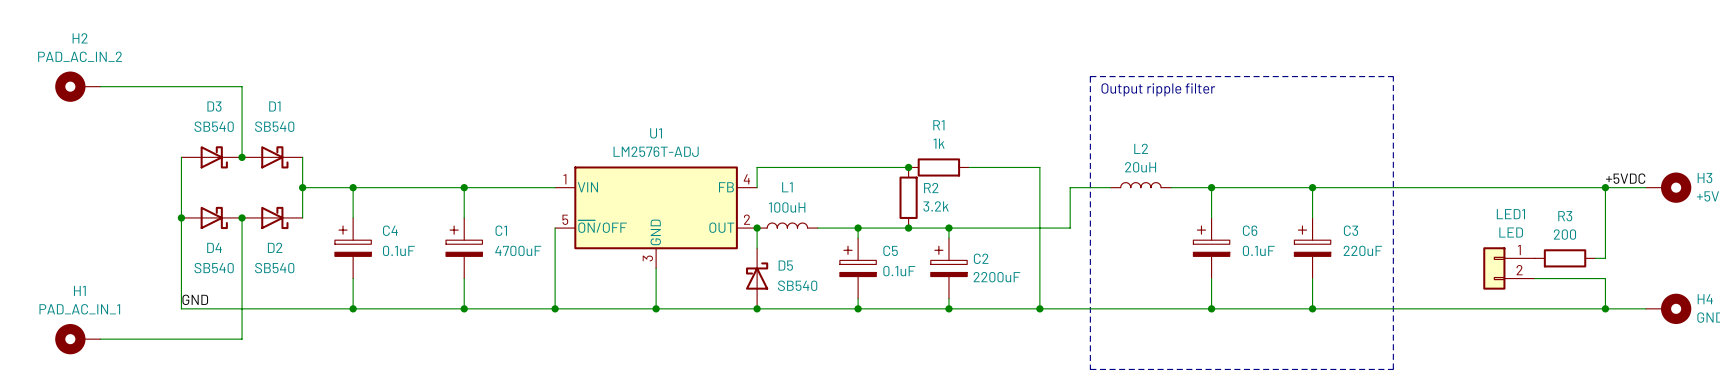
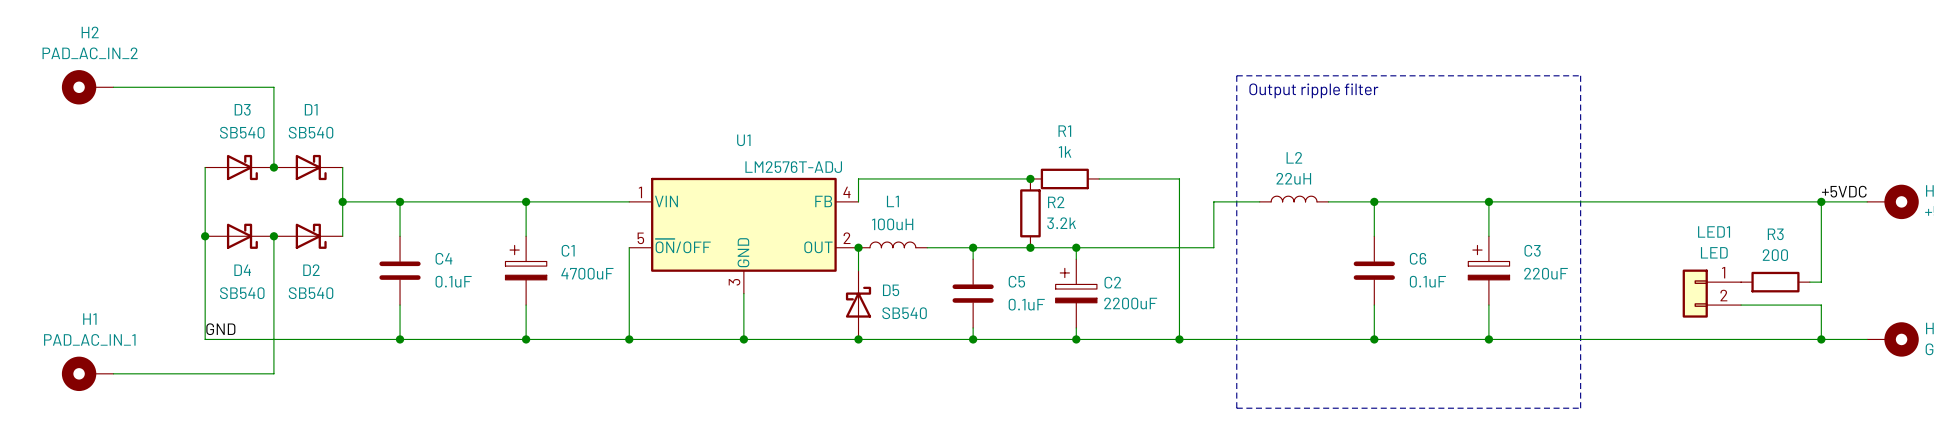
U1 value position: LM2576T-ADJ (656, 151) -> LM2576T-ADJ (793, 167)
L2 value: 20uH (1140, 167) -> 22uH (1293, 178)
C4 symbol: [334, 217, 372, 279] -> [379, 236, 421, 306]
C6 symbol: [1193, 217, 1230, 279] -> [1353, 236, 1395, 306]
C5 symbol: [839, 238, 877, 299] -> [952, 259, 994, 328]

